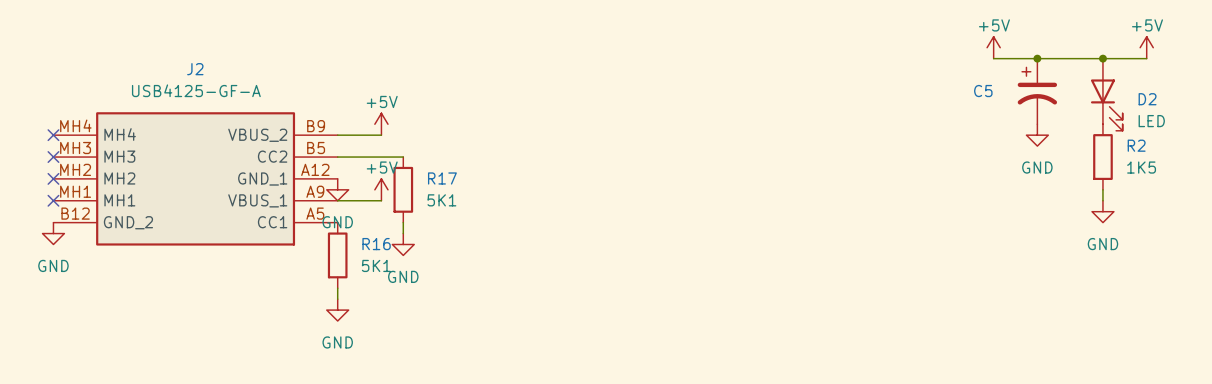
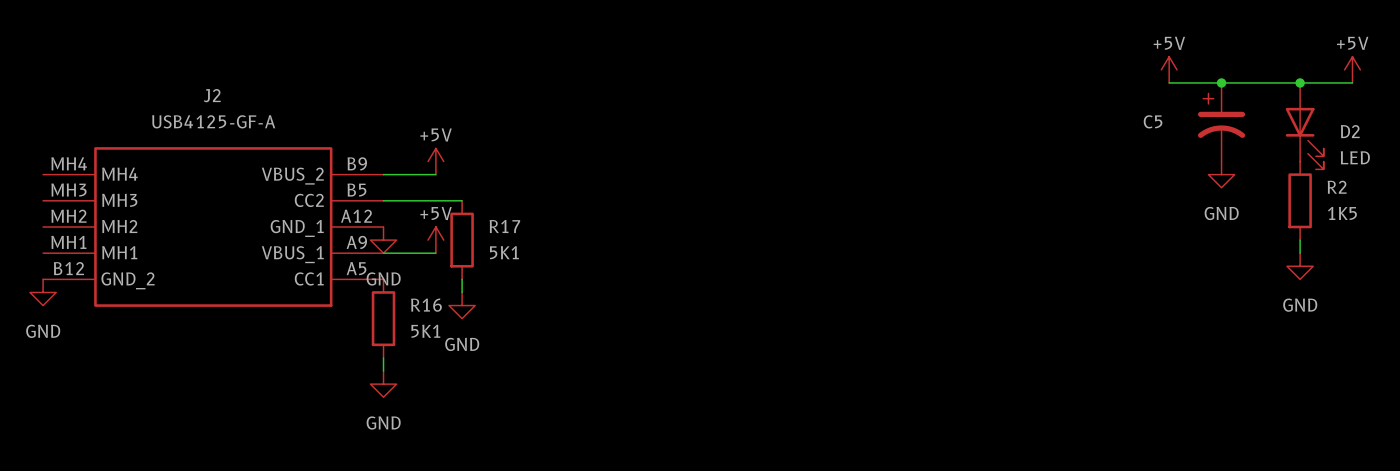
no-connect mark: (53, 135) -> none
no-connect mark: (53, 157) -> none
no-connect mark: (53, 178) -> none
no-connect mark: (53, 200) -> none

